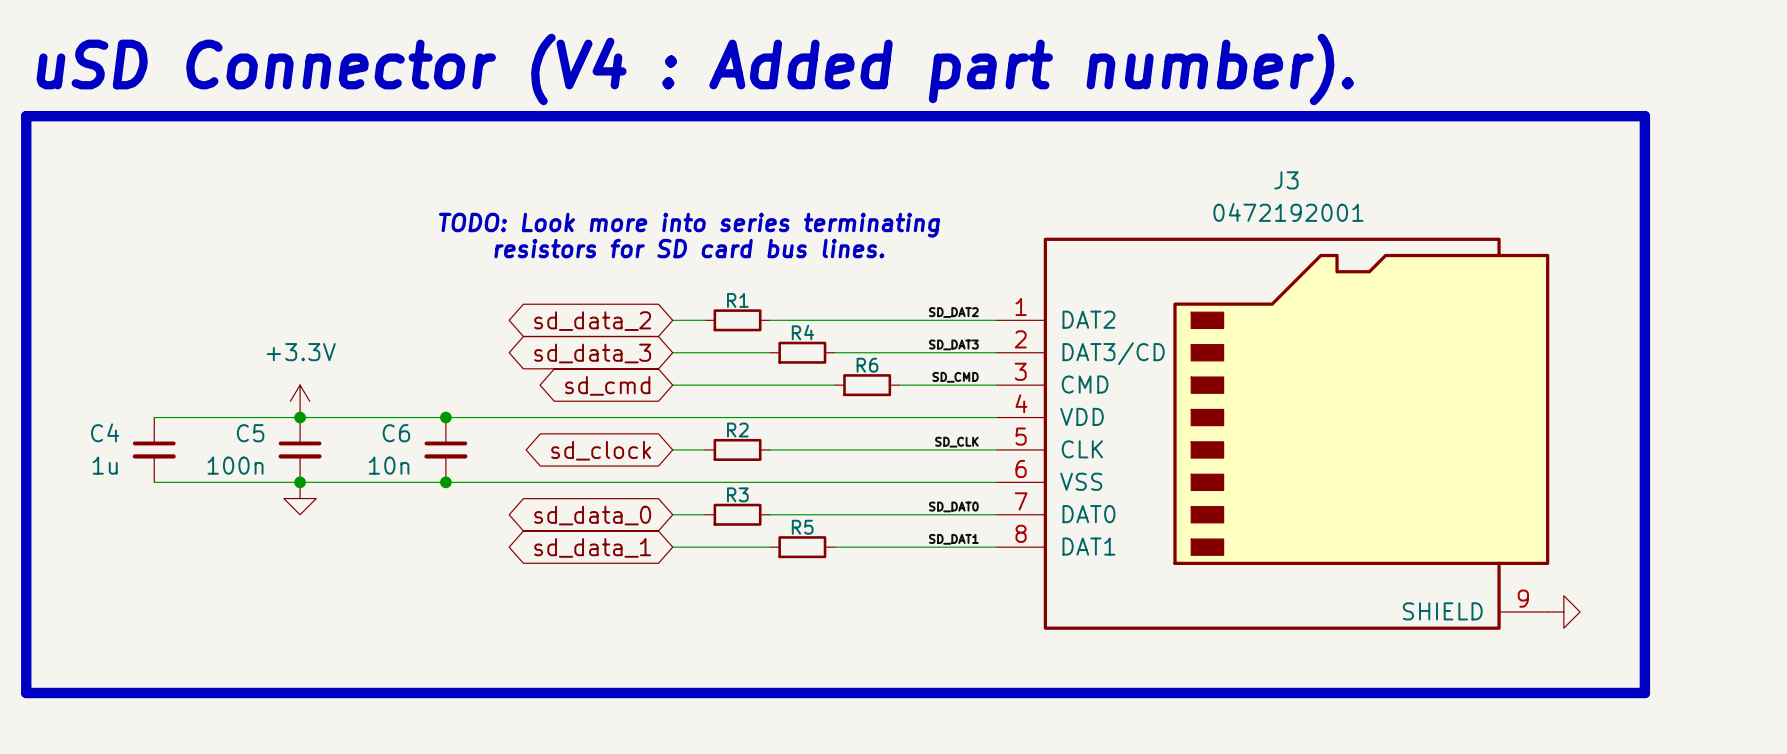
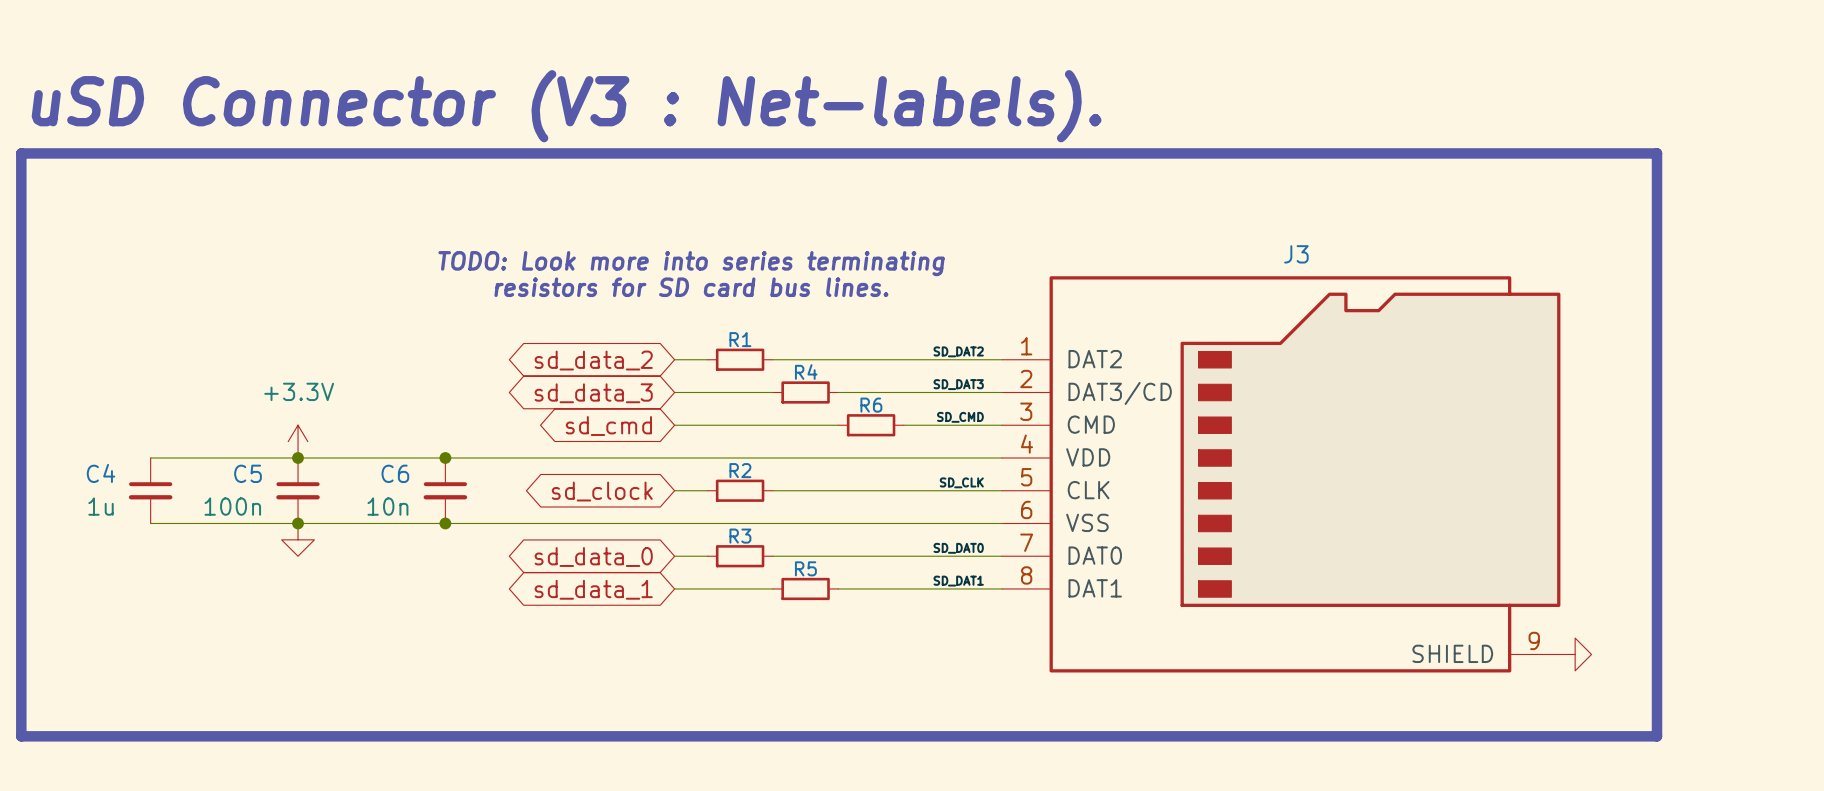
text: uSD Connector (V4 : Added part number). (695, 69) -> uSD Connector (V3 : Net-labels). (566, 106)
J3 name position: J3 (1286, 180) -> J3 (1296, 254)
J3 value: 0472192001 (1288, 212) -> none

